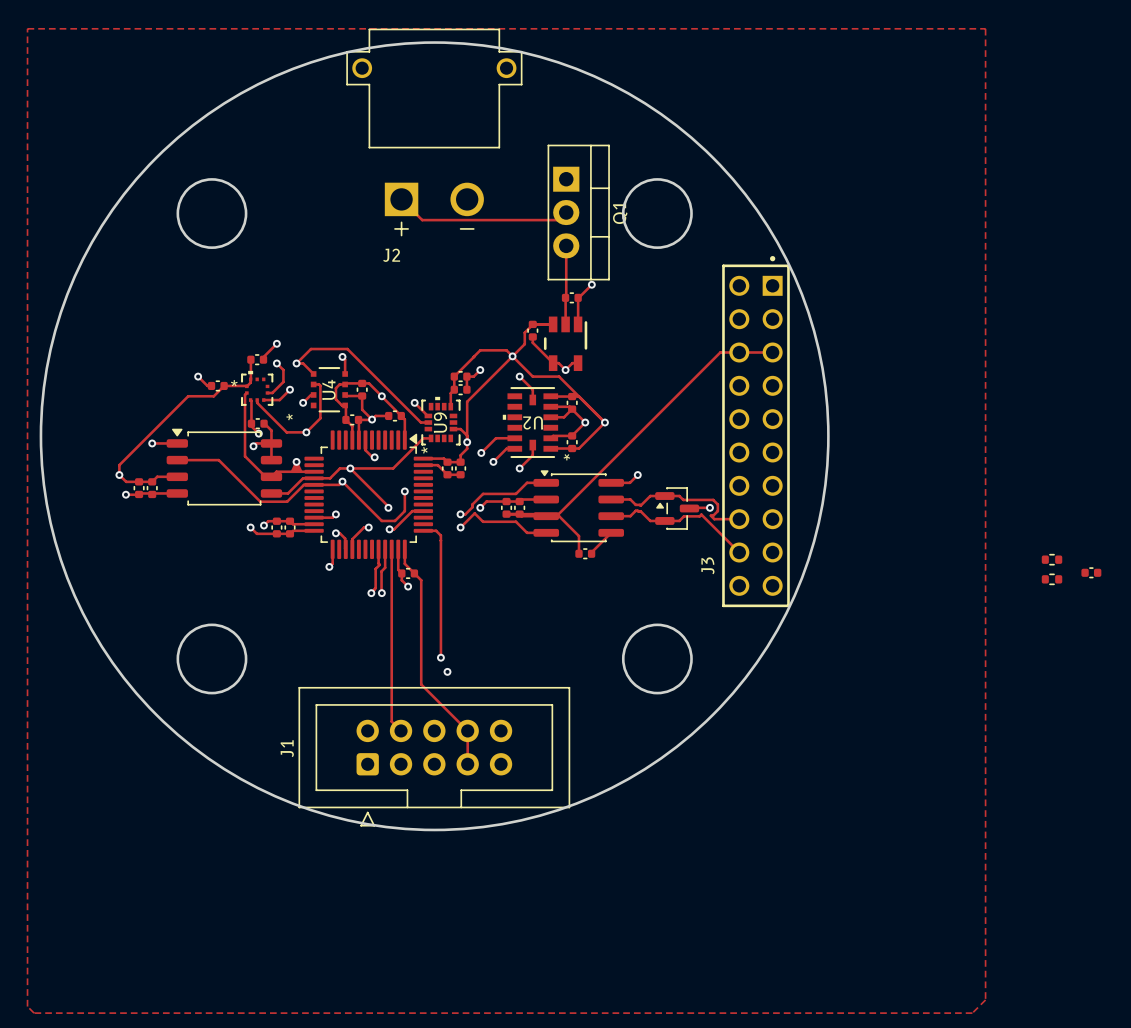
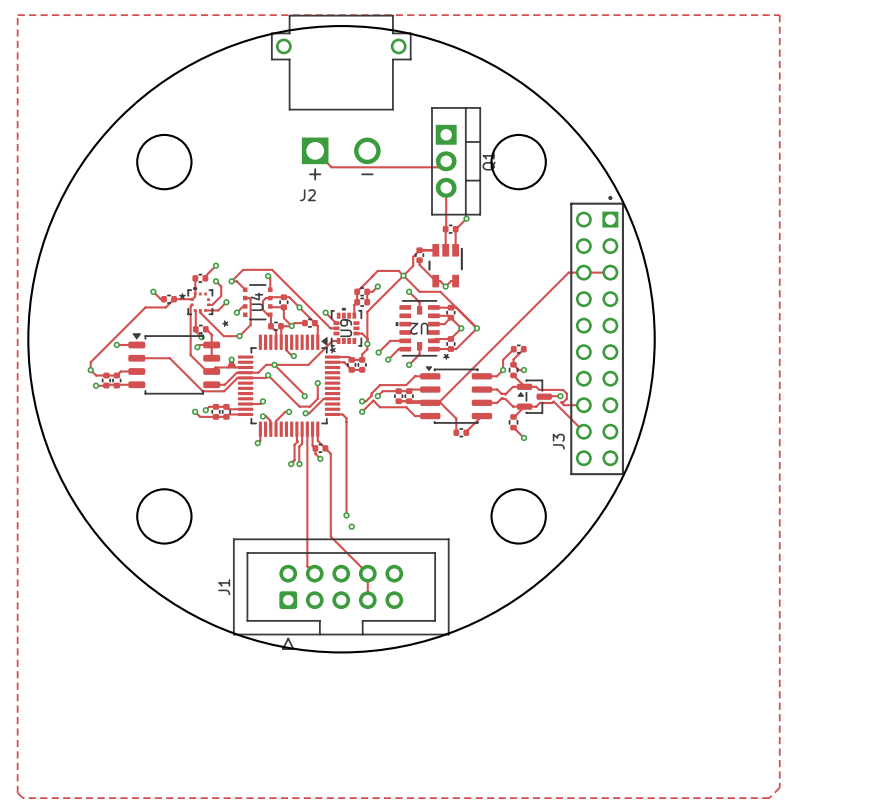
track: none -> (513, 349) (503, 359) (503, 370)
part: none -> (518, 349)
track: none -> (523, 349) (513, 359) (513, 364) (518, 370) (523, 370)
part: none -> (513, 370)
via: none -> (523, 370)
track: none -> (513, 375) (524, 386)
track: none -> (524, 406) (513, 416)
part: none -> (513, 422)
track: none -> (513, 427) (523, 437)
part: (1052, 559) -> none
via: none -> (523, 437)
part: (1091, 572) -> none
part: (1052, 579) -> none

